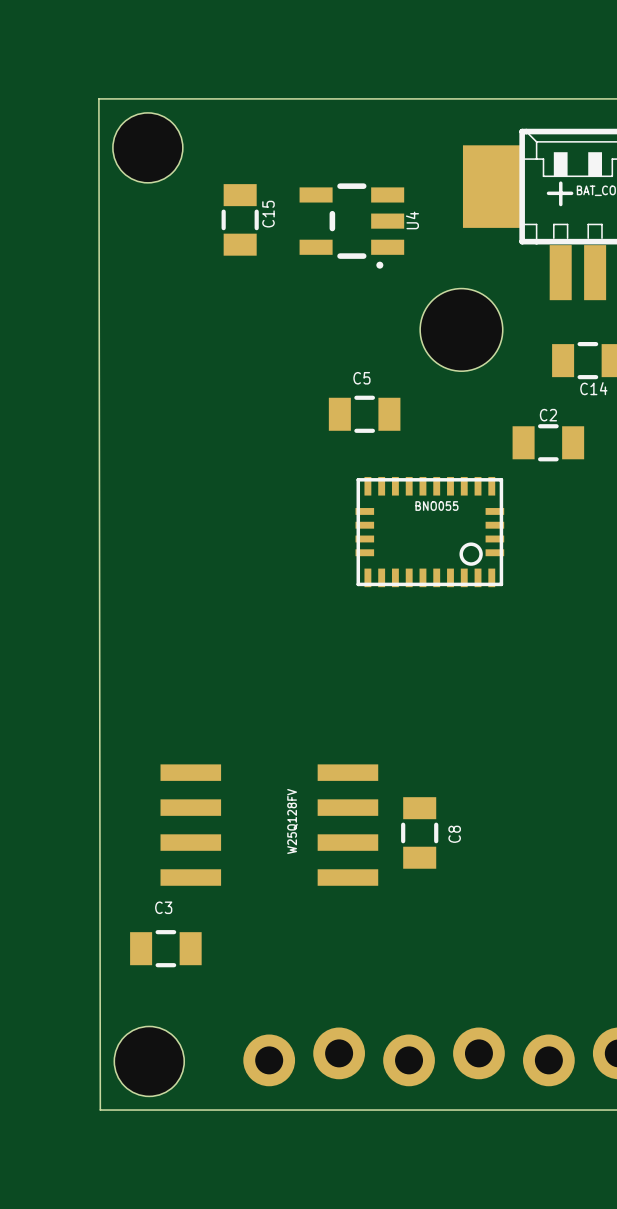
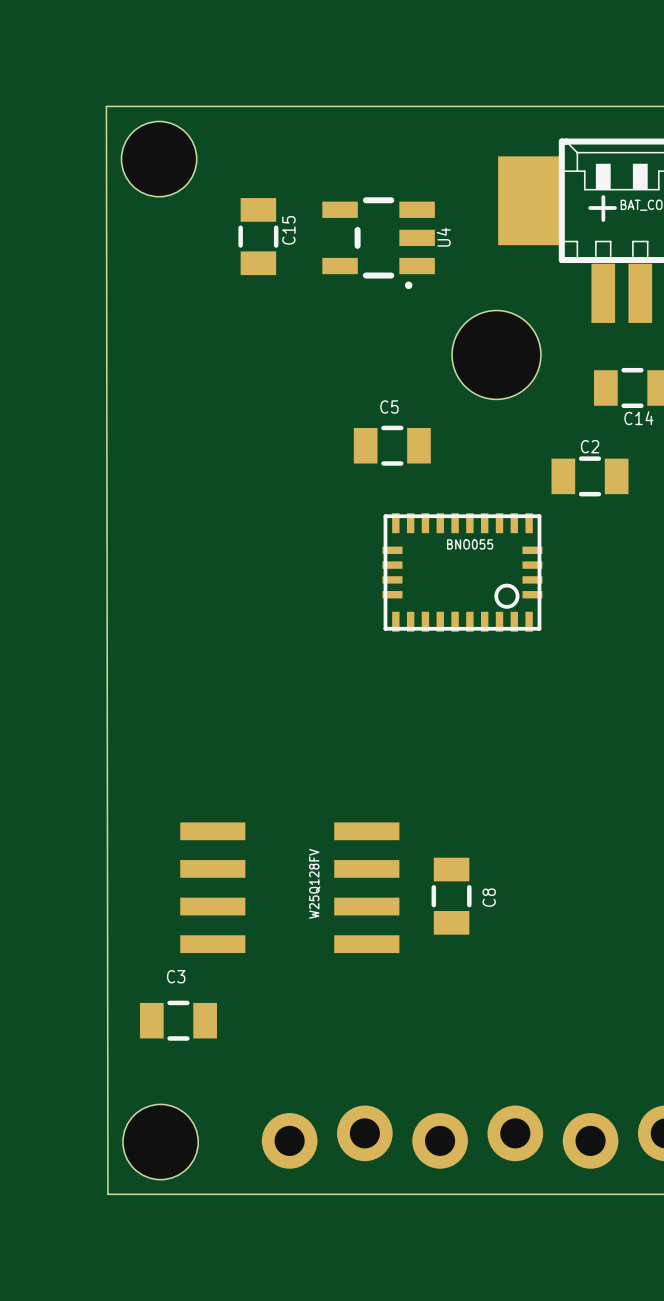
W25Q128FV footprint: [160, 764, 379, 886] -> [180, 822, 400, 954]

